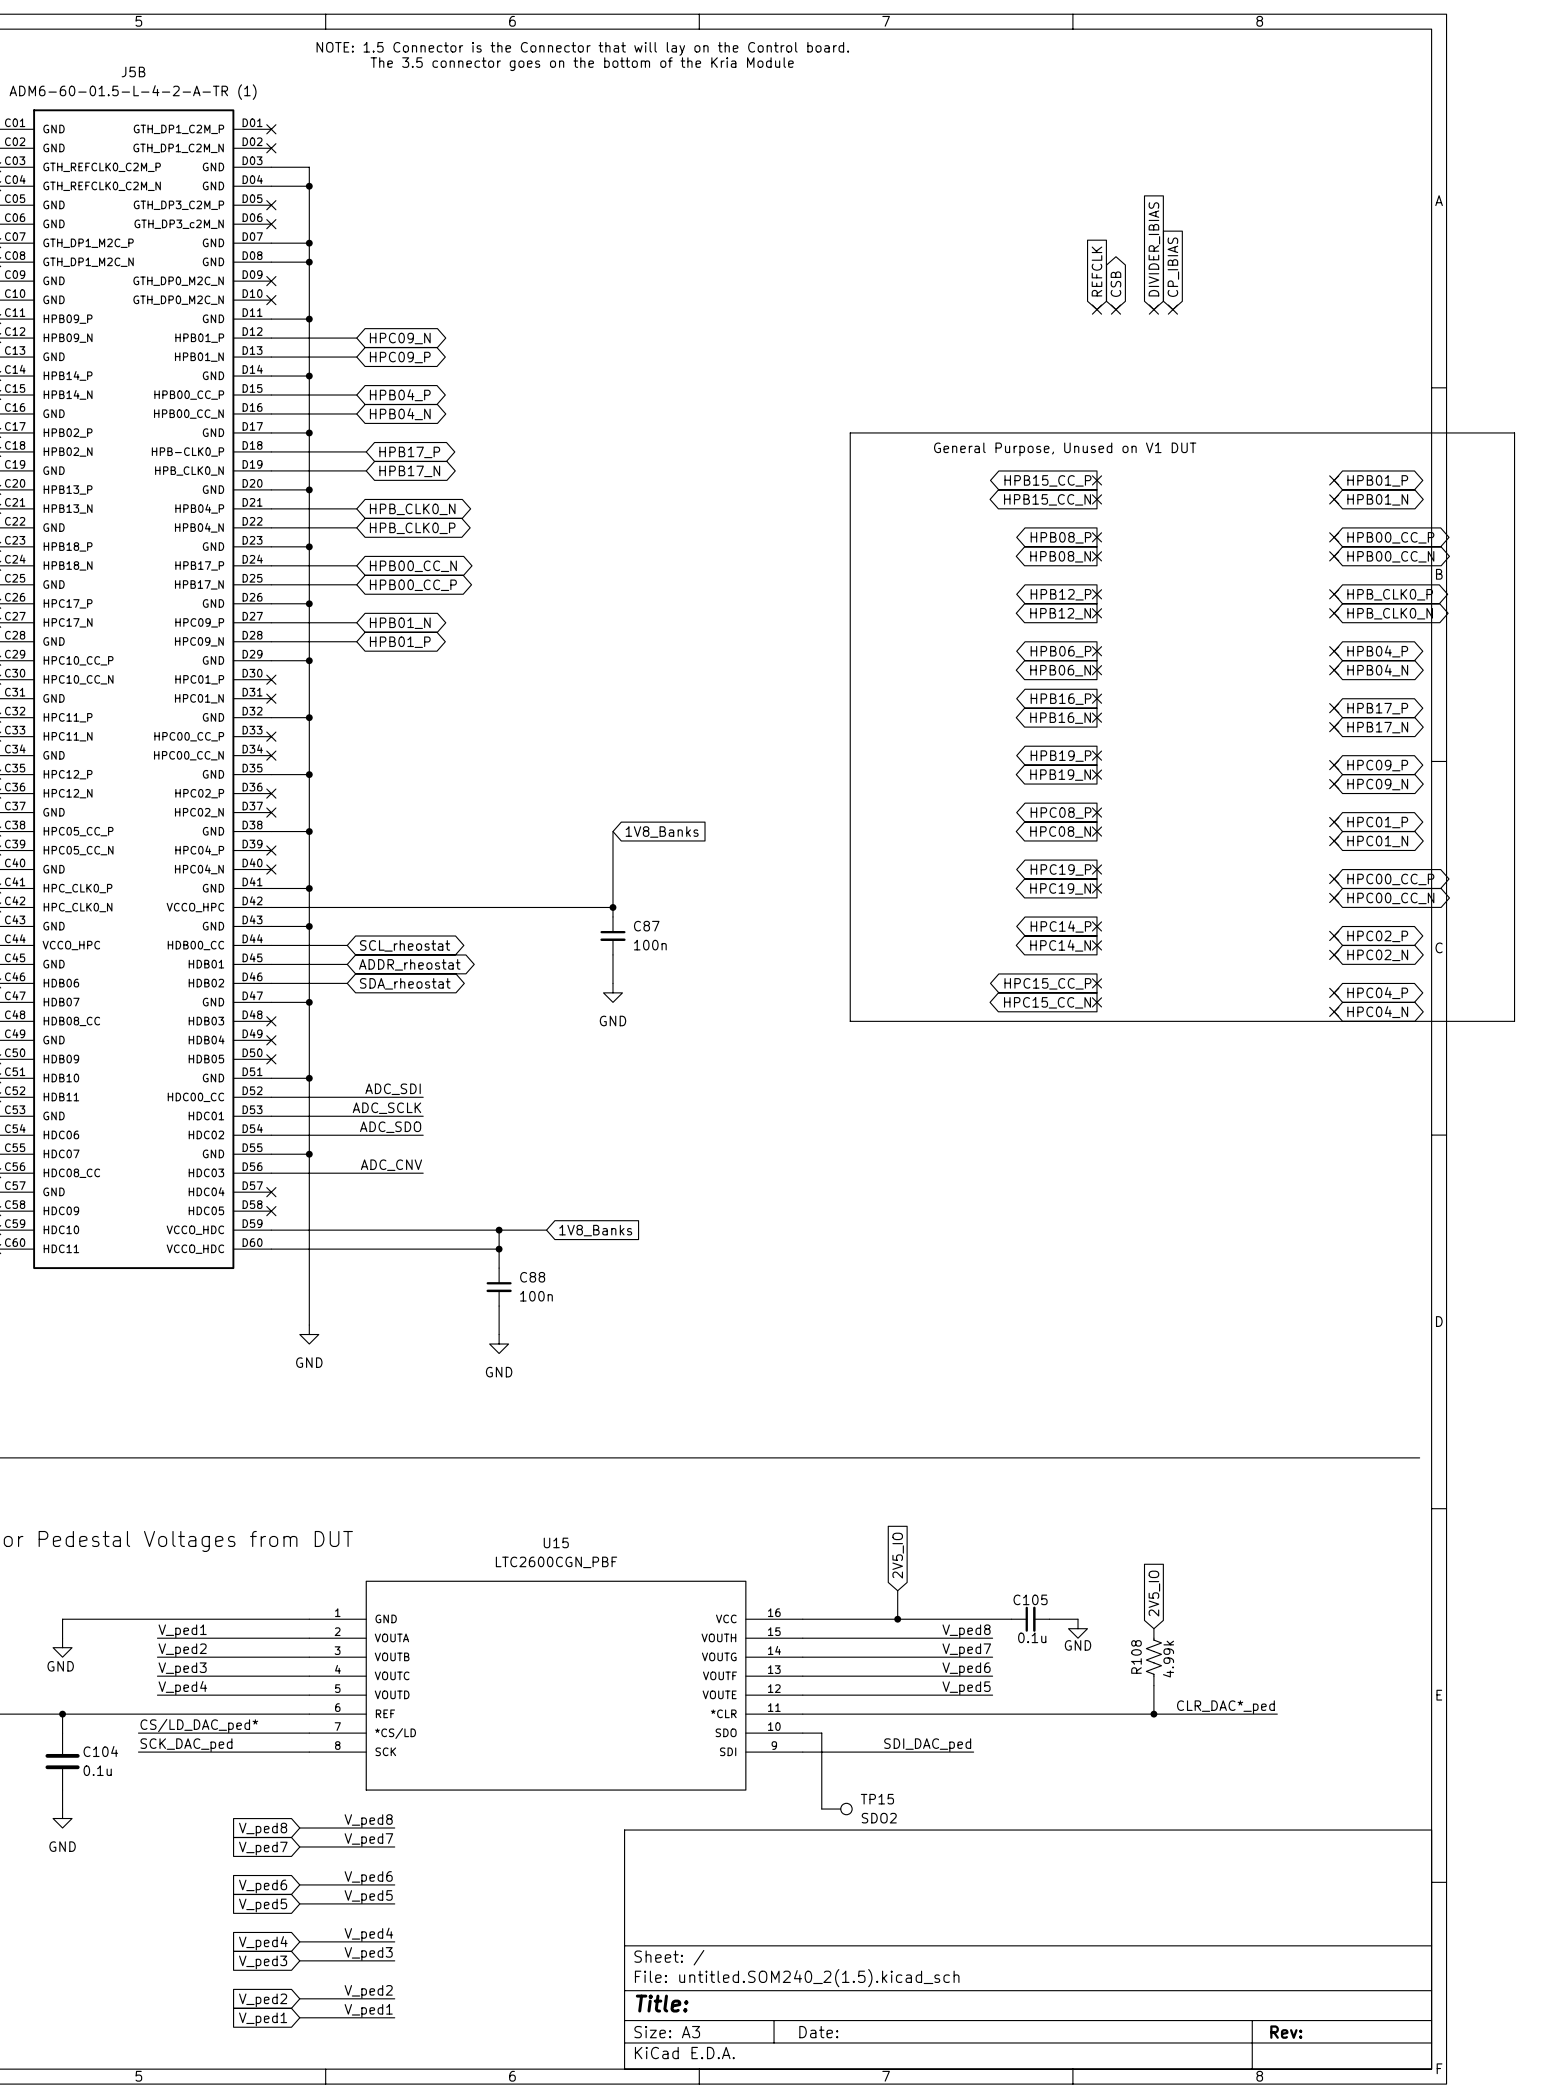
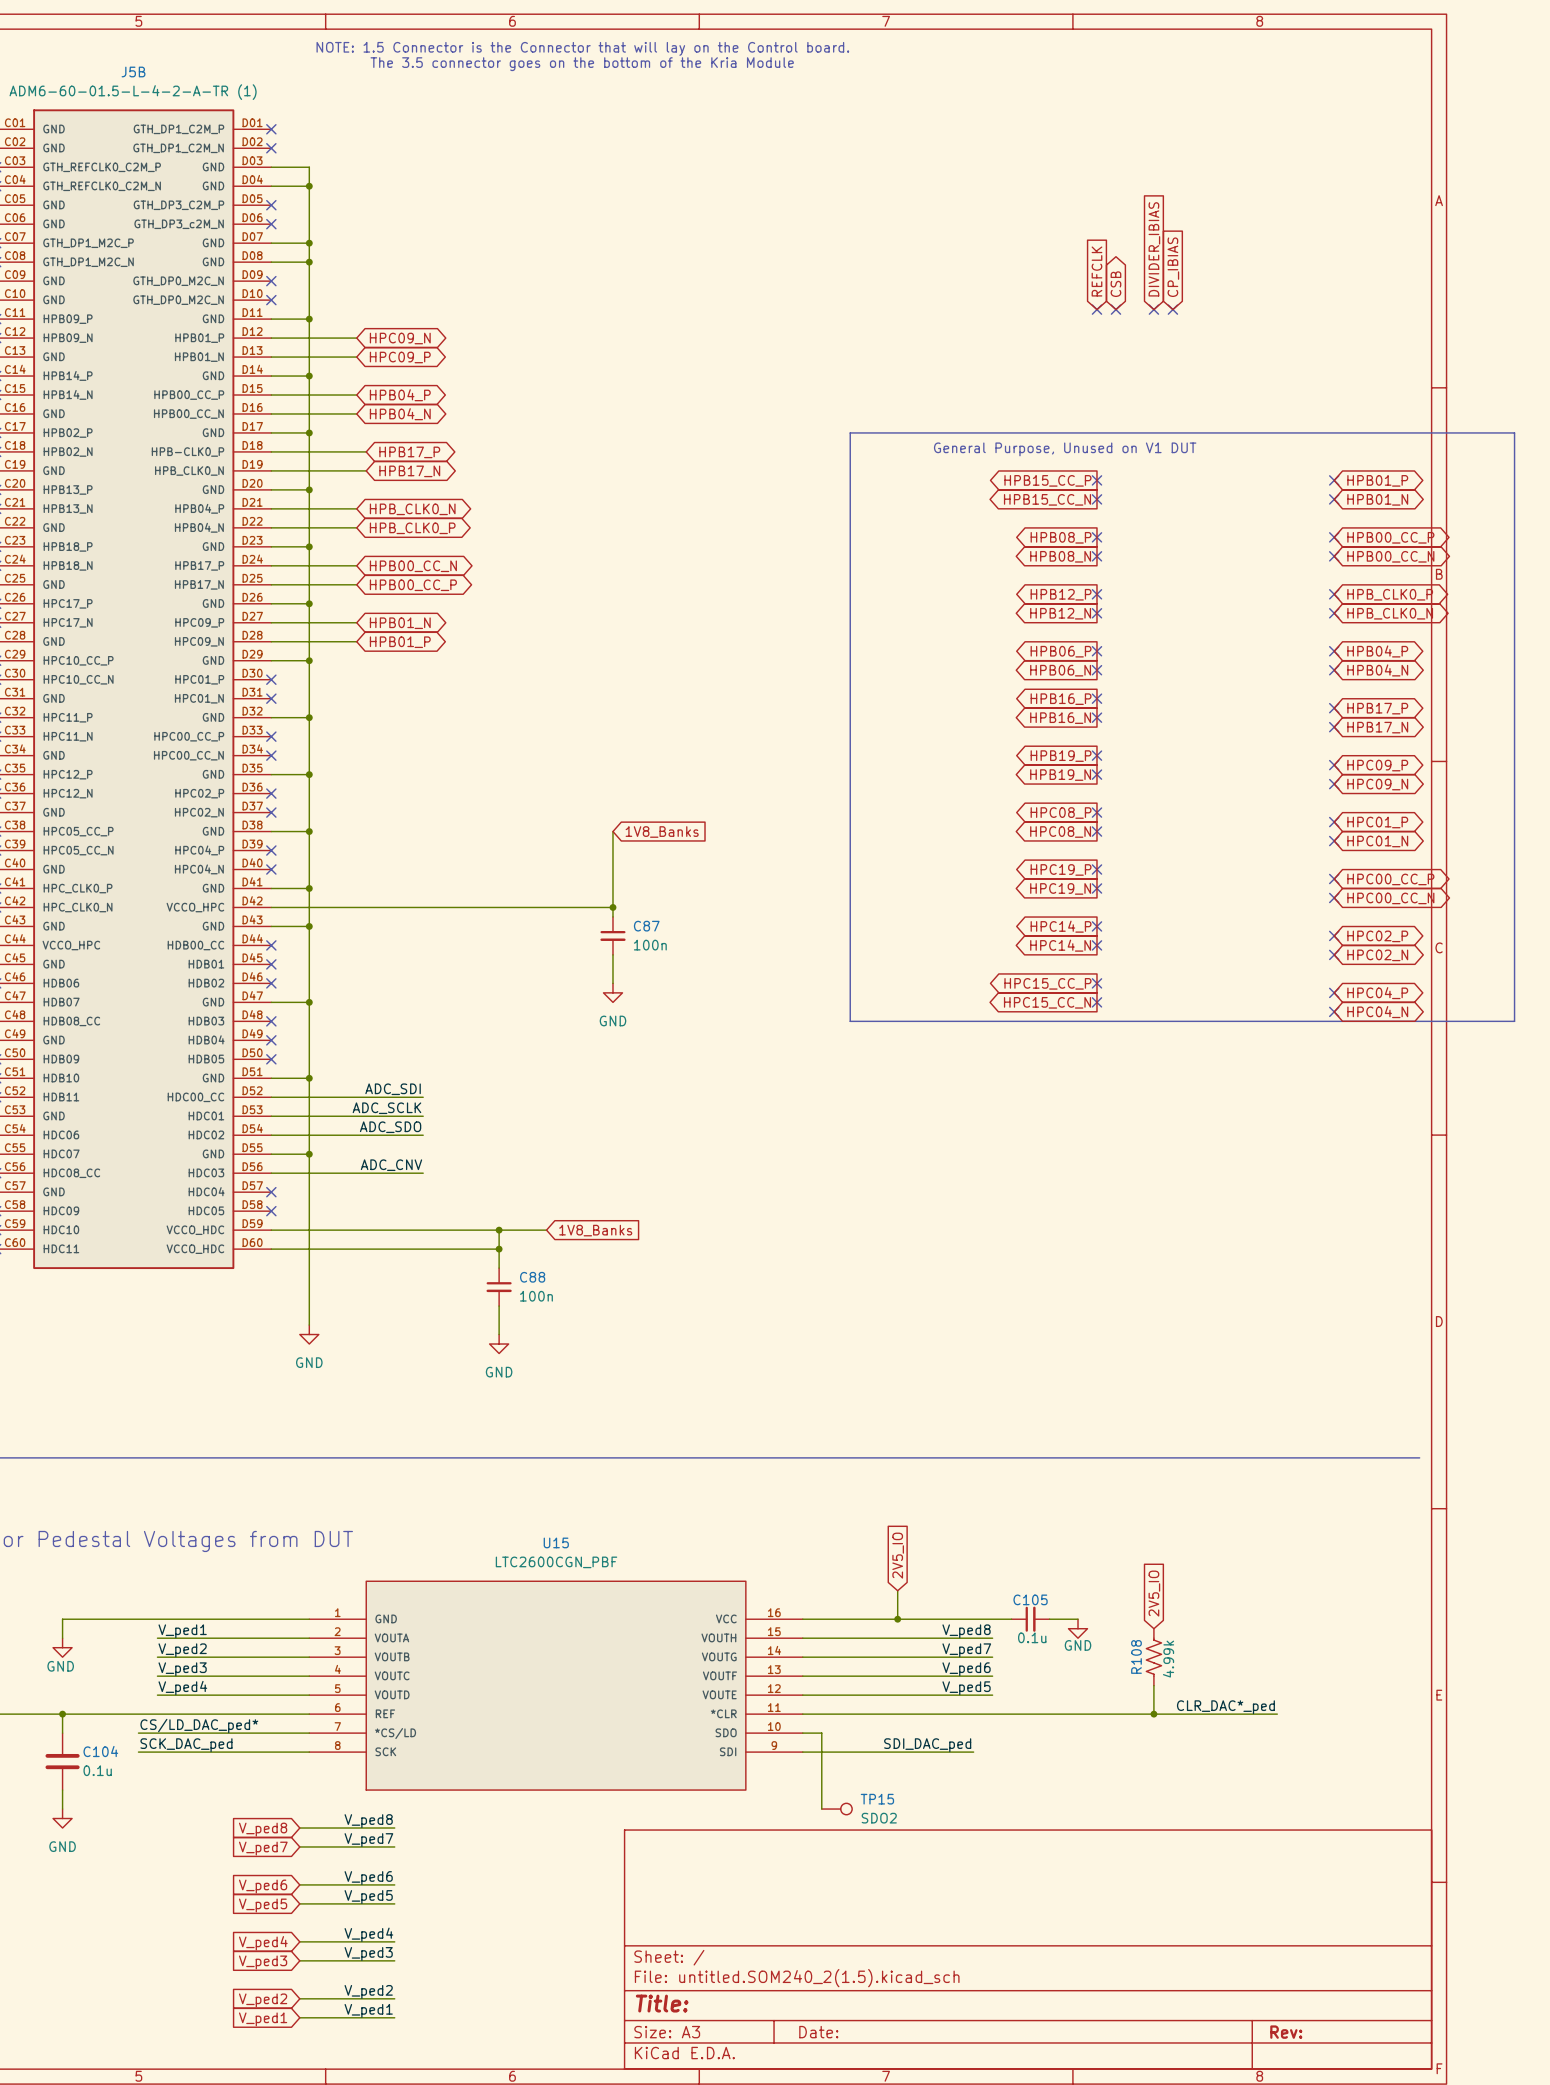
wire: (271, 945) (347, 945) -> none
no-connect mark: none -> (271, 945)
global label: SCL_rheostat (405, 945) -> none
wire: (271, 964) (347, 964) -> none
no-connect mark: none -> (271, 964)
global label: ADDR_rheostat (409, 964) -> none
wire: (271, 983) (347, 983) -> none
no-connect mark: none -> (271, 983)
global label: SDA_rheostat (405, 983) -> none

